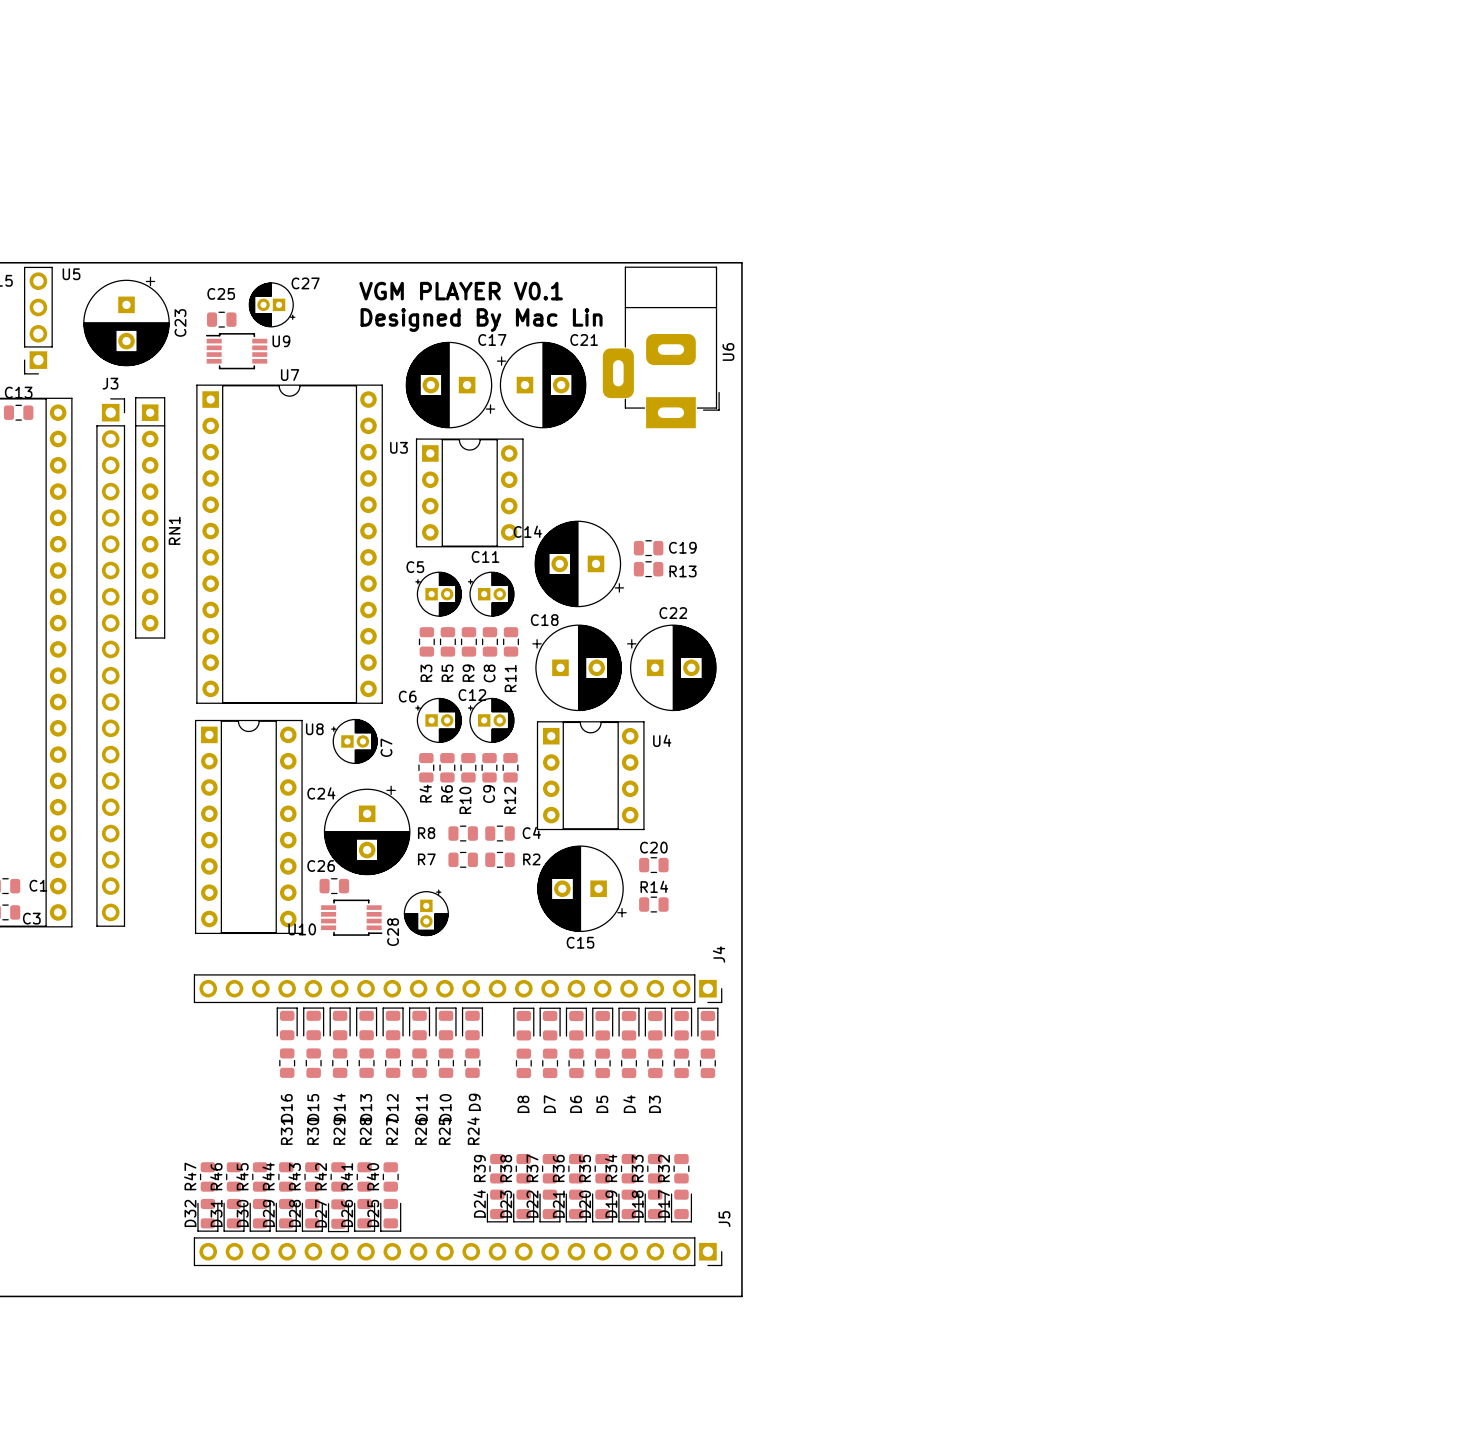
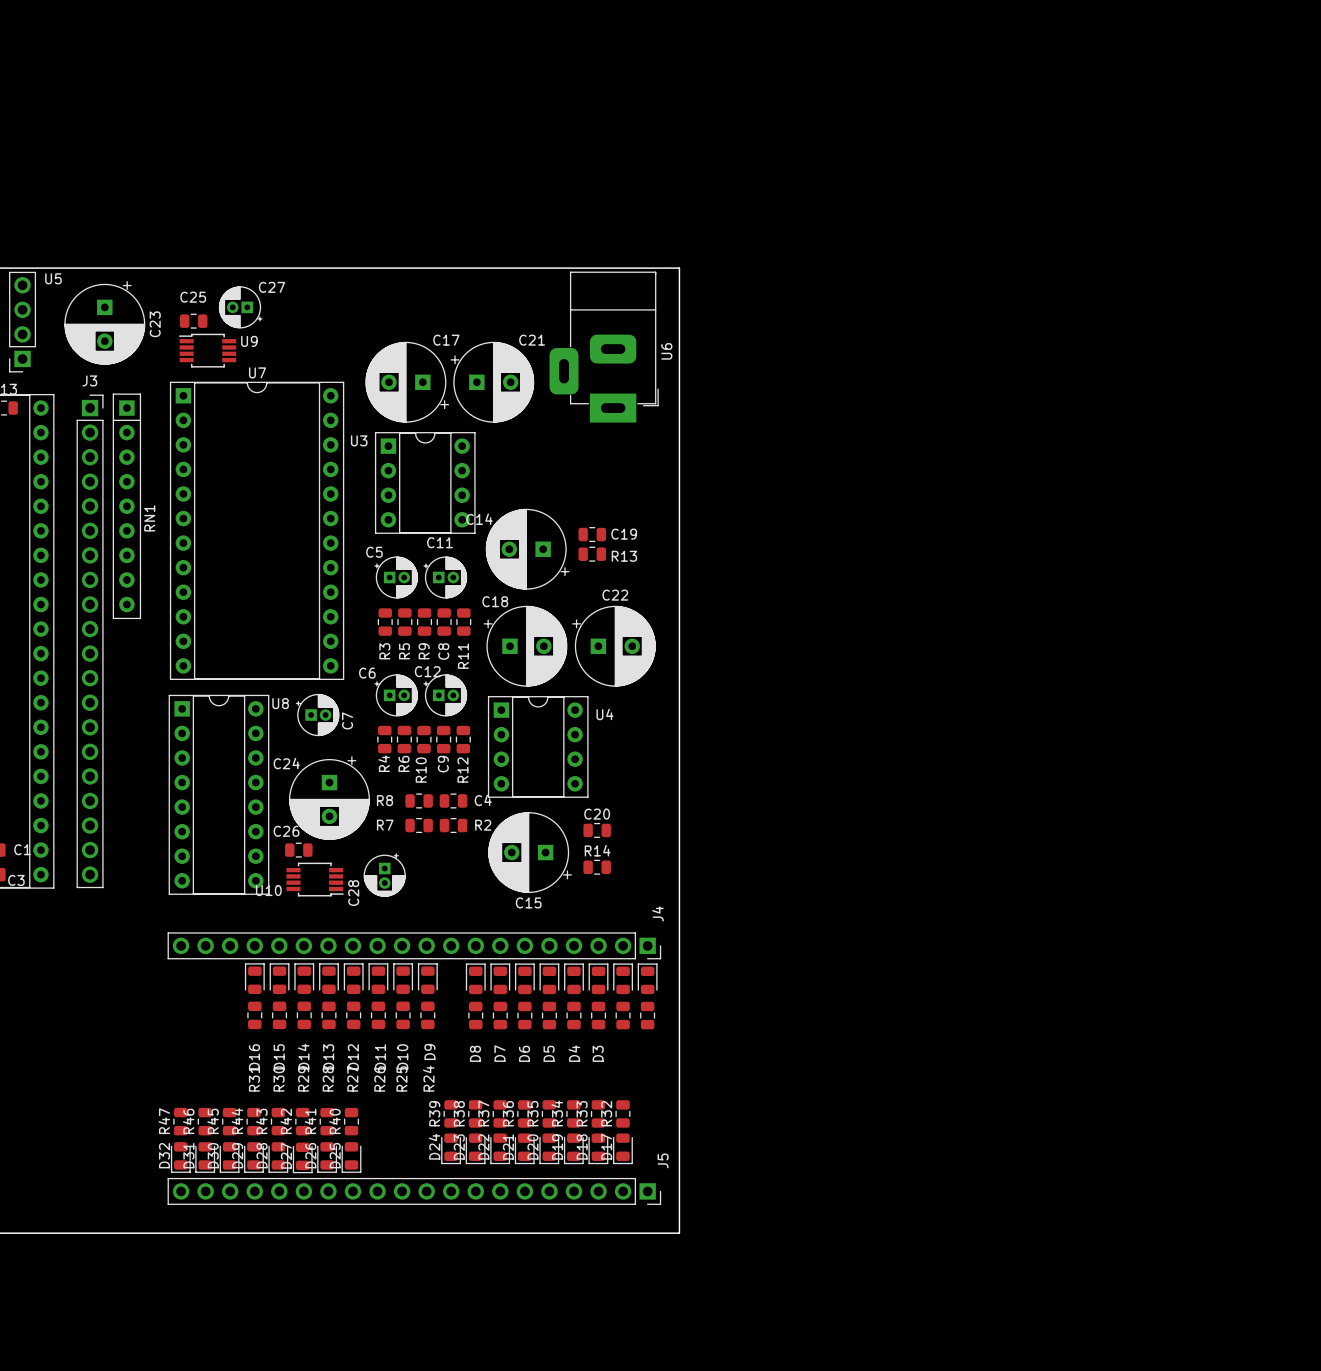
text: VGM PLAYER V0.1 (461, 291) -> none
text: Designed By Mac Lin (481, 320) -> none

